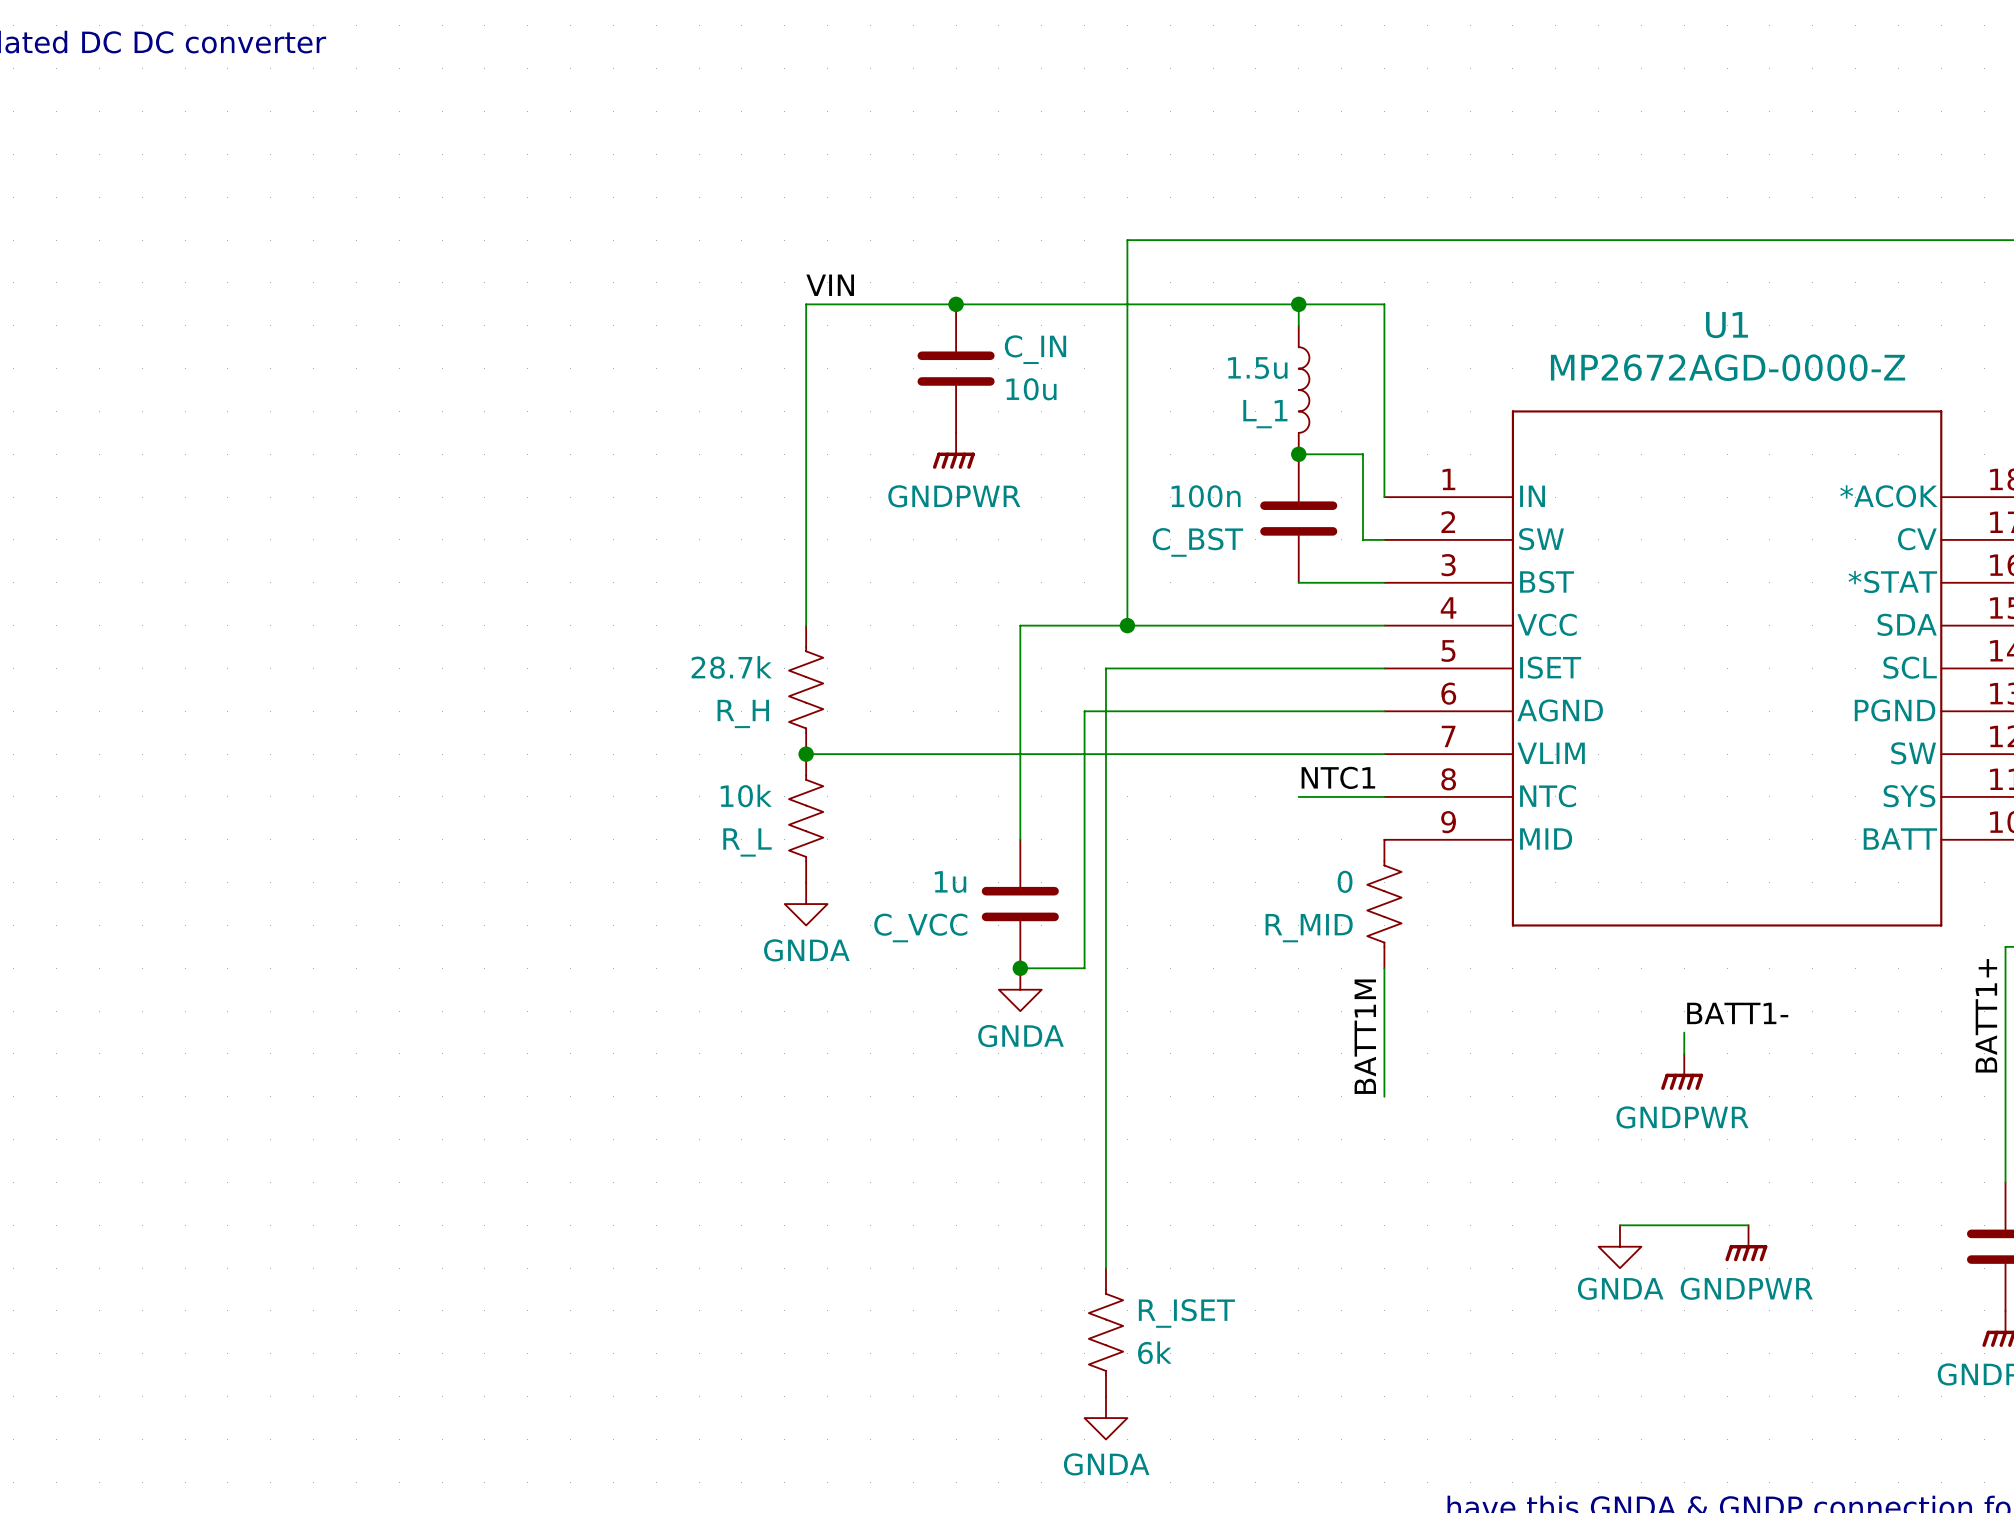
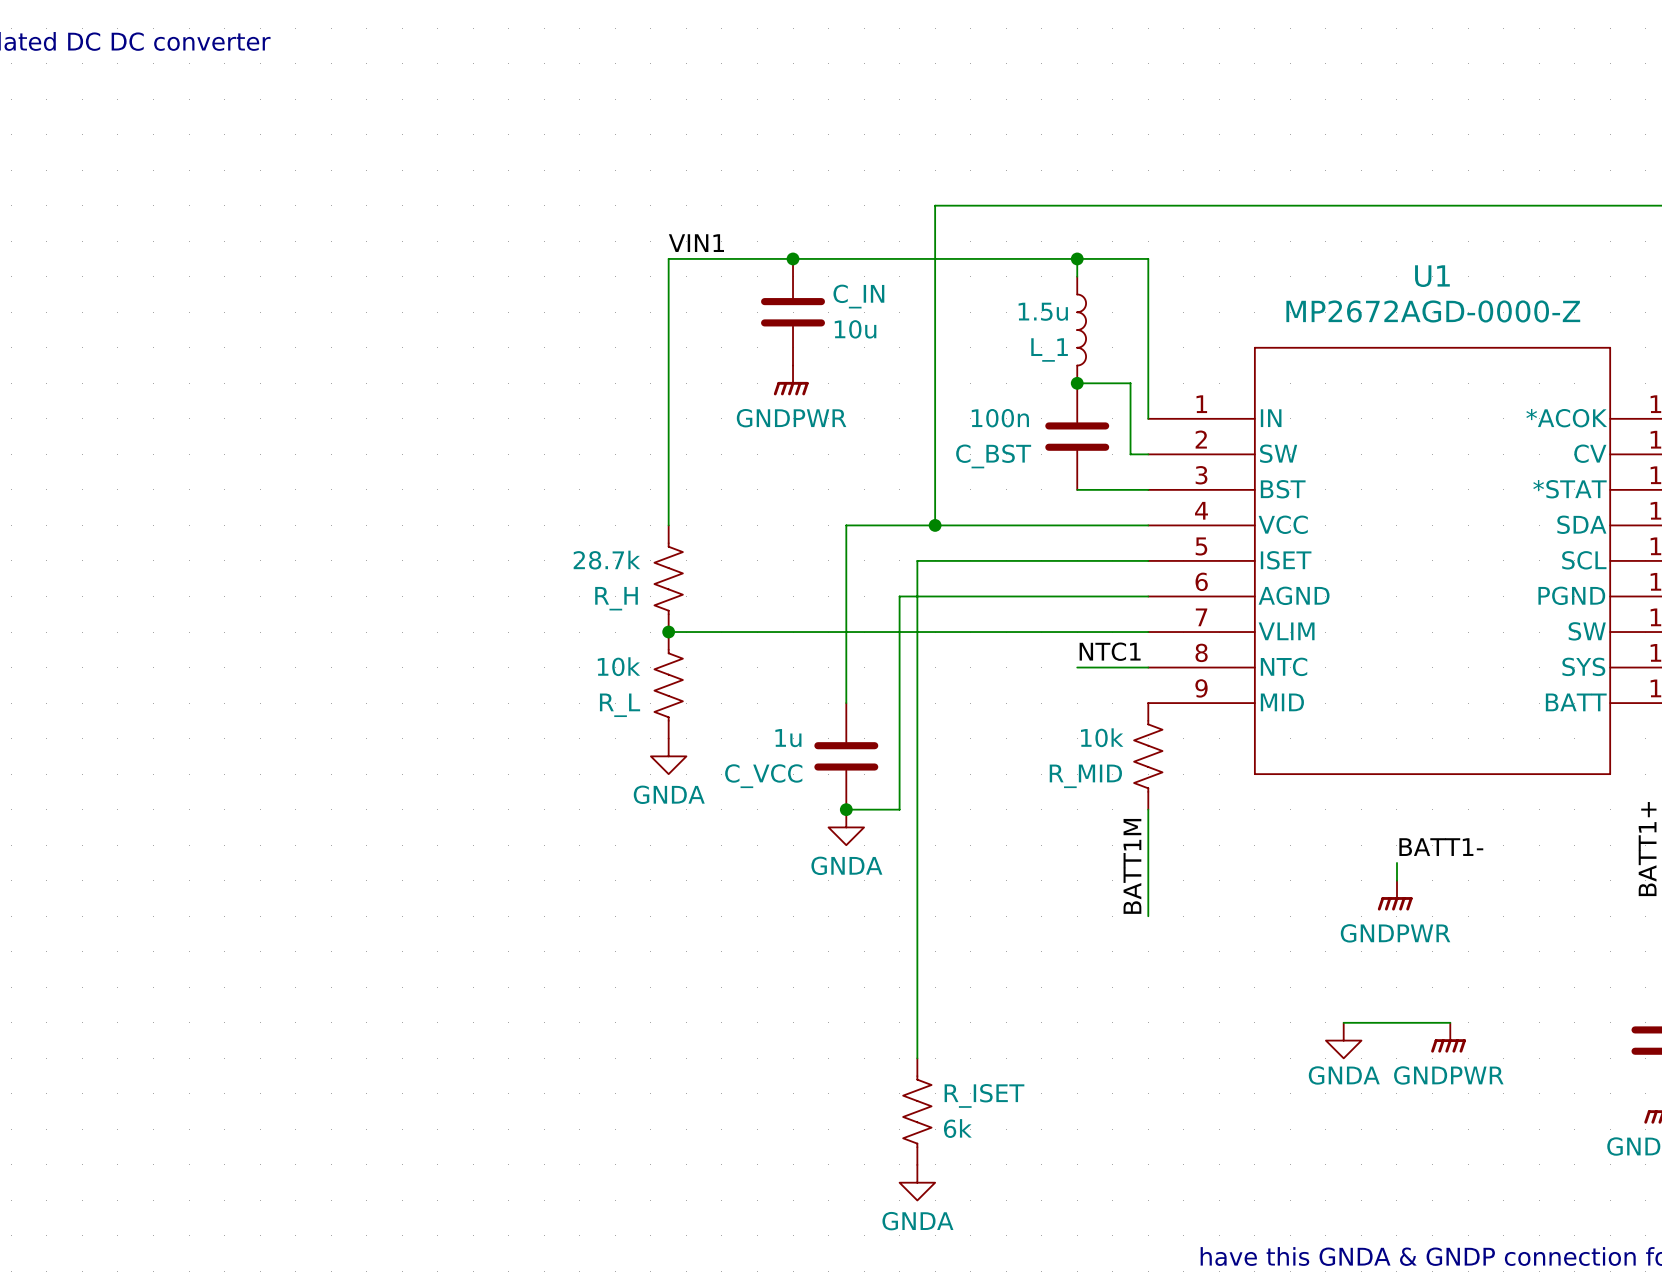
label: VIN (830, 285) -> VIN1 (696, 243)
R_MID value: 0 (1345, 881) -> 10k (1102, 737)

